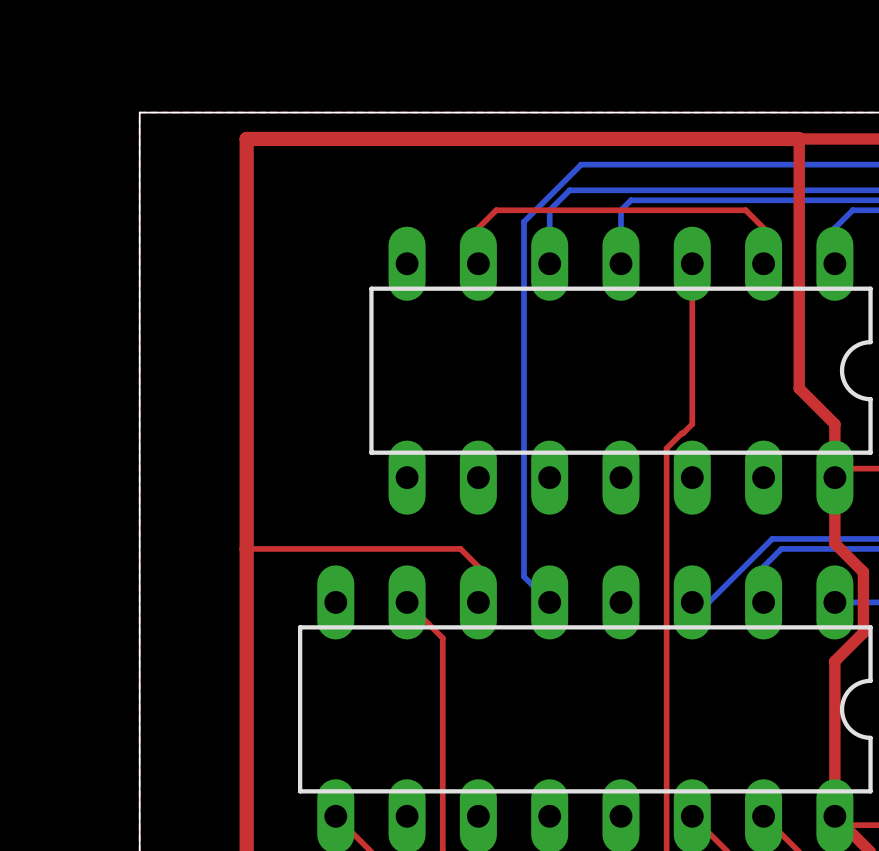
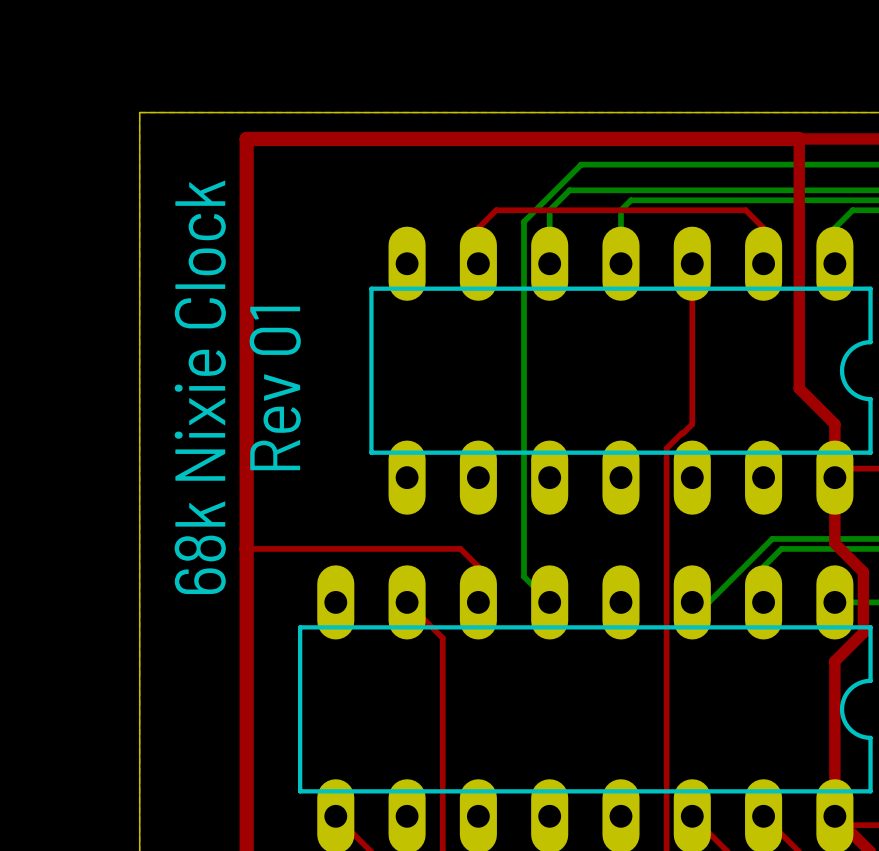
text: none -> Rev 01 (275, 388)
text: none -> 68k Nixie Clock (200, 387)

